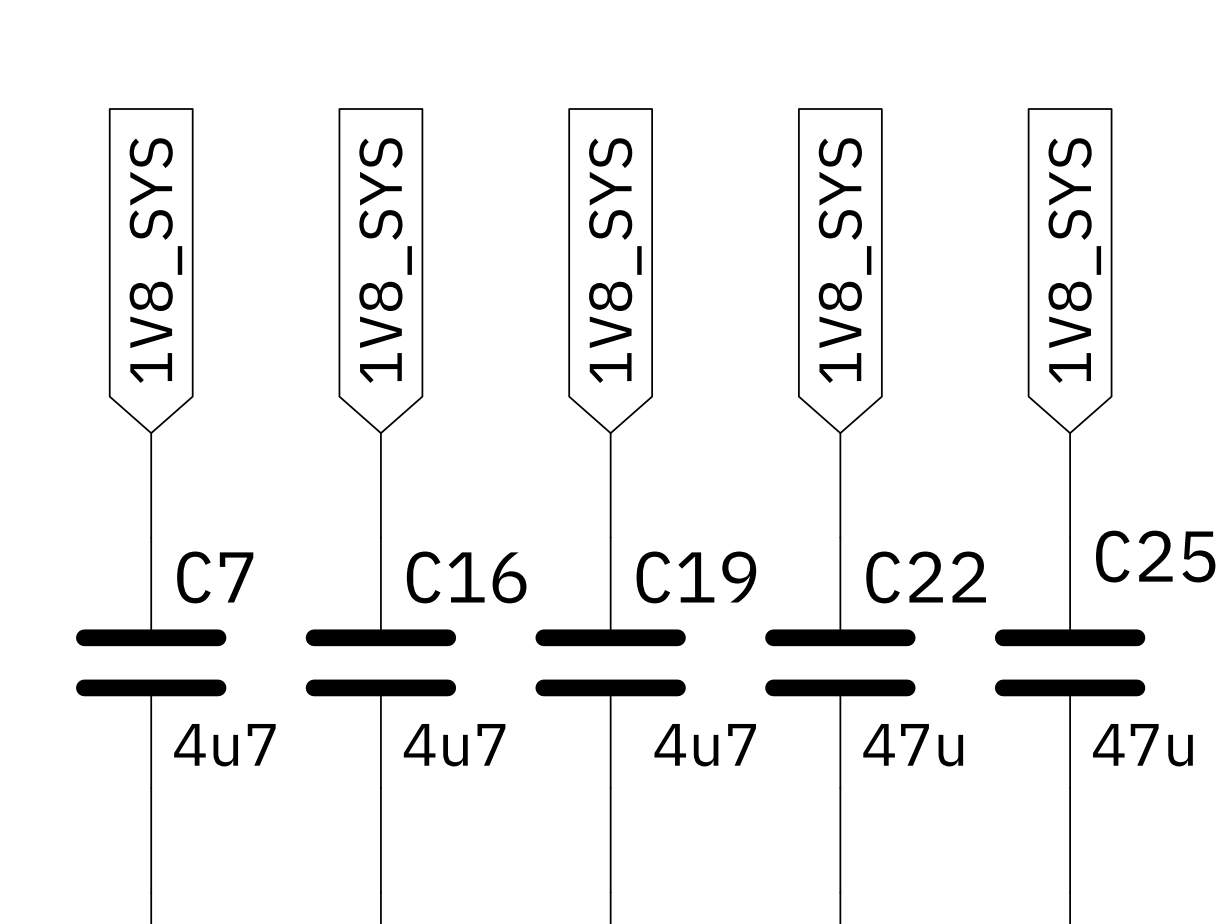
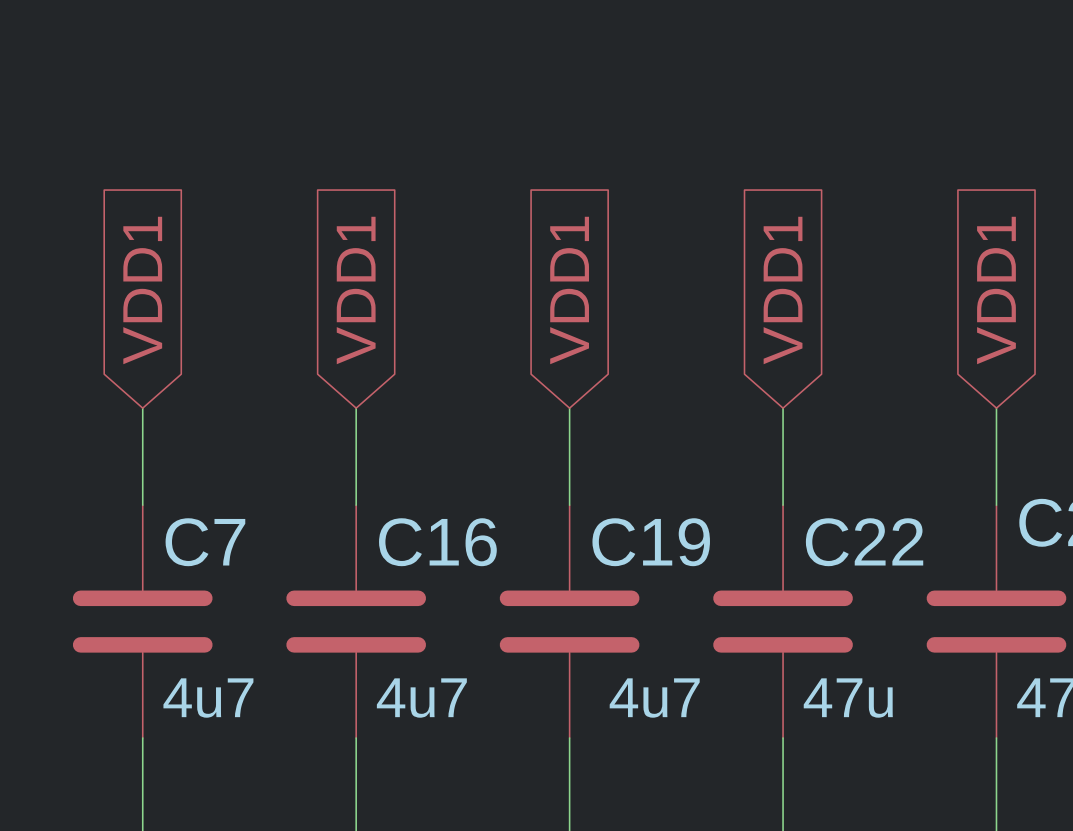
global label: 1V8_SYS (155, 260) -> VDD1 (142, 290)
global label: 1V8_SYS (385, 260) -> VDD1 (356, 290)
global label: 1V8_SYS (615, 260) -> VDD1 (569, 290)
global label: 1V8_SYS (845, 260) -> VDD1 (783, 290)
global label: 1V8_SYS (1074, 260) -> VDD1 (996, 290)

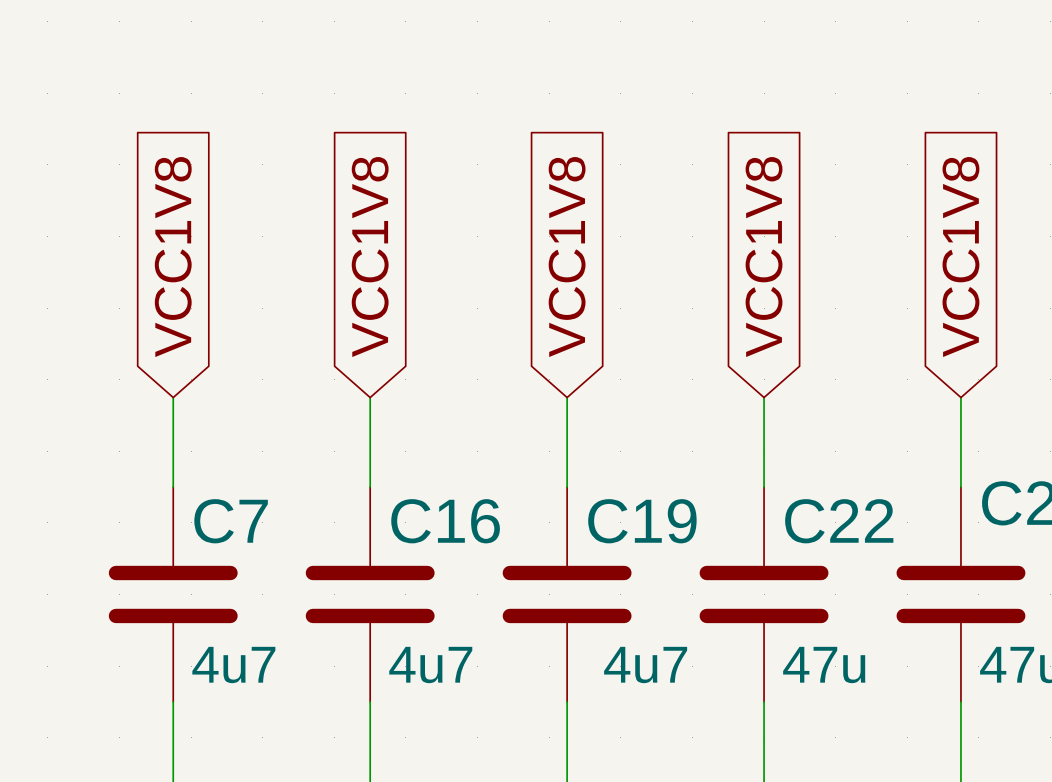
global label: VDD1 (142, 290) -> VCC1V8 (173, 257)
global label: VDD1 (356, 290) -> VCC1V8 (370, 257)
global label: VDD1 (569, 290) -> VCC1V8 (567, 257)
global label: VDD1 (783, 290) -> VCC1V8 (764, 257)
global label: VDD1 (996, 290) -> VCC1V8 (960, 257)

